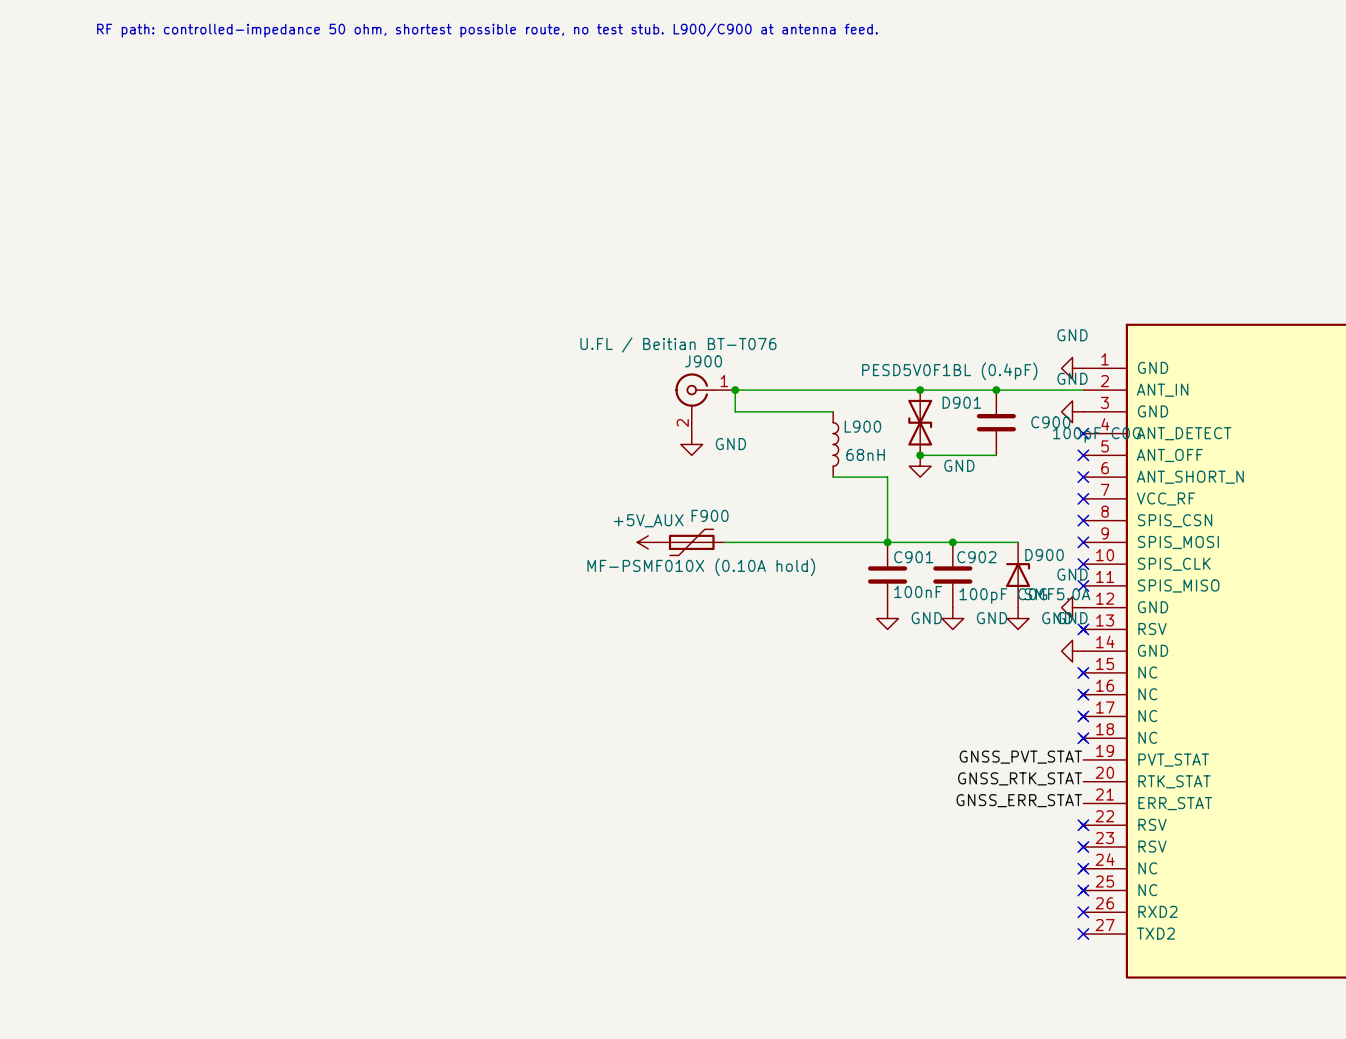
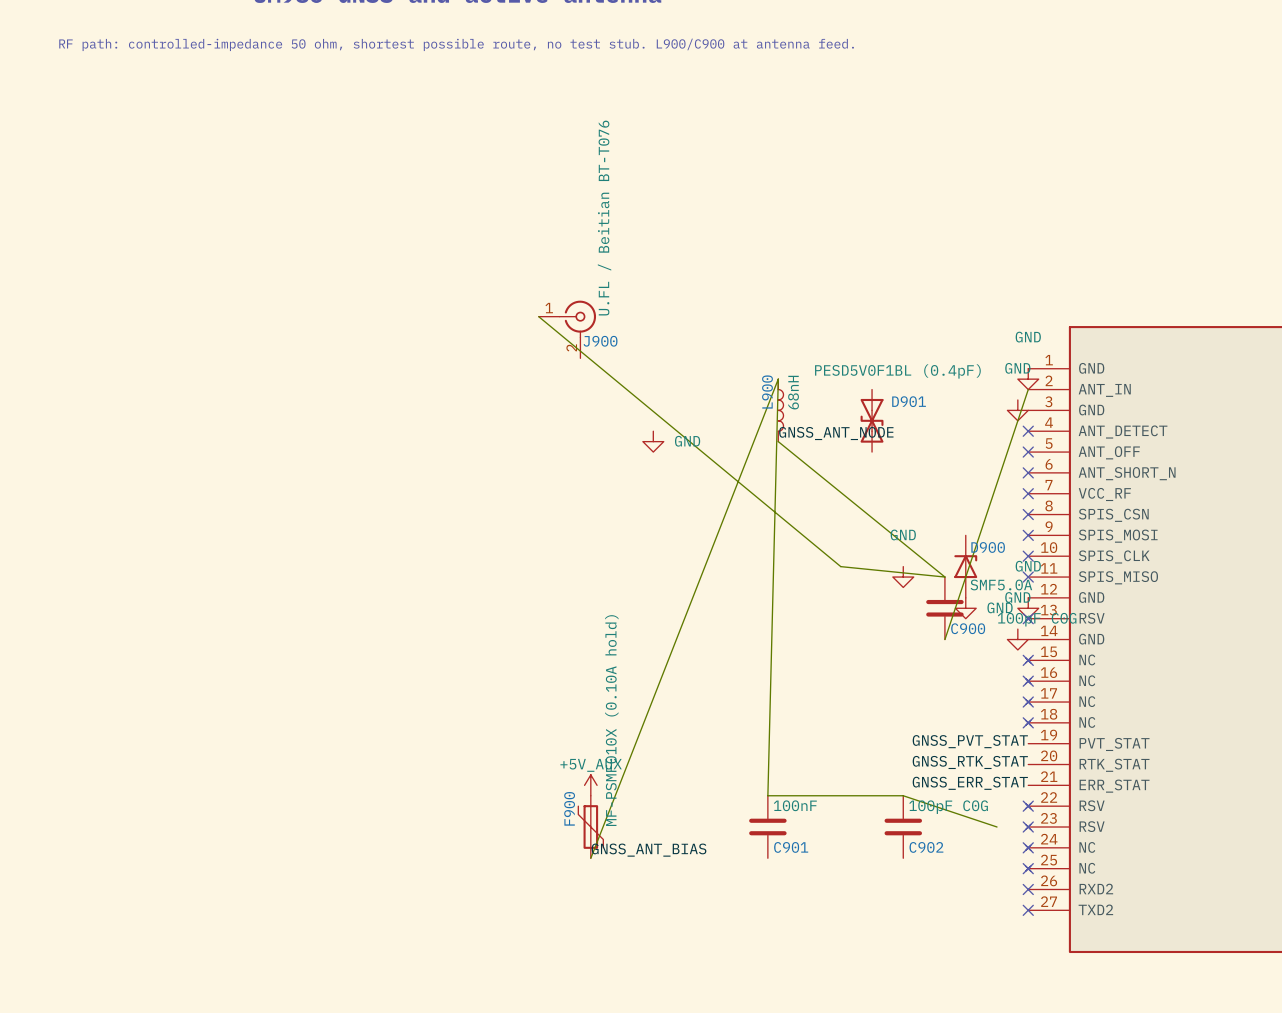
wire: none -> (538, 316) (840, 566) (944, 577) (778, 441)
J900 value position: U.FL / Beitian BT-T076 (678, 345) -> U.FL / Beitian BT-T076 (604, 218)
J900 name position: J900 (703, 361) -> J900 (600, 341)
power symbol rotation: 0° (1072, 368) -> 90° counterclockwise (1028, 379)
power symbol position: GND (1072, 368) -> GND (1028, 379)
junction: (735, 390) -> none
junction: (920, 390) -> none
junction: (996, 390) -> none
wire: (1083, 390) (735, 390) (735, 411) (833, 411) -> (1028, 389) (944, 639)
J900 flip: as is (694, 392) -> left-right (577, 319)
J900 position: (705, 403) -> (567, 329)
power symbol rotation: 0° (1072, 411) -> 90° counterclockwise (1017, 410)
C900 position: (996, 422) -> (944, 608)
C900 name position: C900 (1050, 422) -> C900 (968, 628)
L900 name rotation: 0° (862, 426) -> 90° counterclockwise (767, 392)
label: none -> GNSS_ANT_NODE (836, 433)
L900 position: (835, 444) -> (780, 410)
L900 value rotation: 0° (865, 454) -> 90° counterclockwise (793, 392)
wire: (920, 455) (996, 455) -> none
junction: (920, 455) -> none
power symbol: GND (920, 466) -> none
wire: (833, 477) (887, 477) (887, 542) -> none
F900 name position: F900 (710, 515) -> F900 (569, 808)
power symbol: +5V_AUX (648, 542) -> none
F900 rotation: 0° (691, 542) -> 90° clockwise (590, 827)
F900 position: (691, 542) -> (590, 827)
wire: (724, 542) (1018, 542) -> none
junction: (887, 542) -> none
junction: (952, 542) -> none
C901 name position: C901 (913, 557) -> C901 (791, 847)
C902 name position: C902 (976, 557) -> C902 (926, 847)
F900 value position: MF-PSMF010X (0.10A hold) (701, 567) -> MF-PSMF010X (0.10A hold) (611, 720)
C901 position: (887, 575) -> (767, 827)
C902 position: (952, 575) -> (903, 827)
C901 value position: 100nF (918, 592) -> 100nF (795, 805)
C902 value position: 100pF C0G (1003, 596) -> 100pF C0G (948, 807)
power symbol rotation: 0° (1072, 607) -> 90° counterclockwise (1028, 608)
power symbol position: GND (1072, 607) -> GND (1028, 608)
power symbol: GND (887, 618) -> none
power symbol position: GND (952, 618) -> GND (903, 577)
power symbol text position: GND (992, 618) -> GND (903, 534)
power symbol rotation: 0° (1072, 651) -> 90° counterclockwise (1017, 639)
power symbol: none -> +5V_AUX (590, 785)
wire: none -> (997, 827) (903, 795) (767, 795) (778, 379) (590, 858)
label: none -> GNSS_ANT_BIAS (649, 850)

